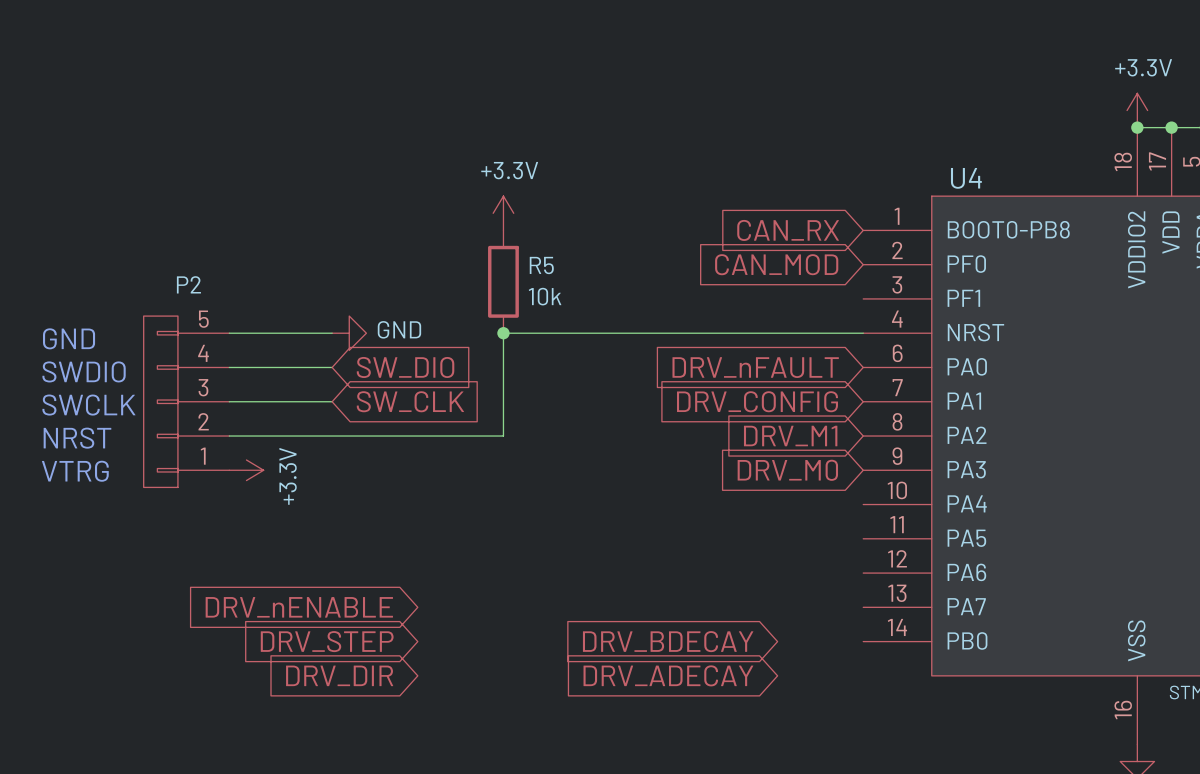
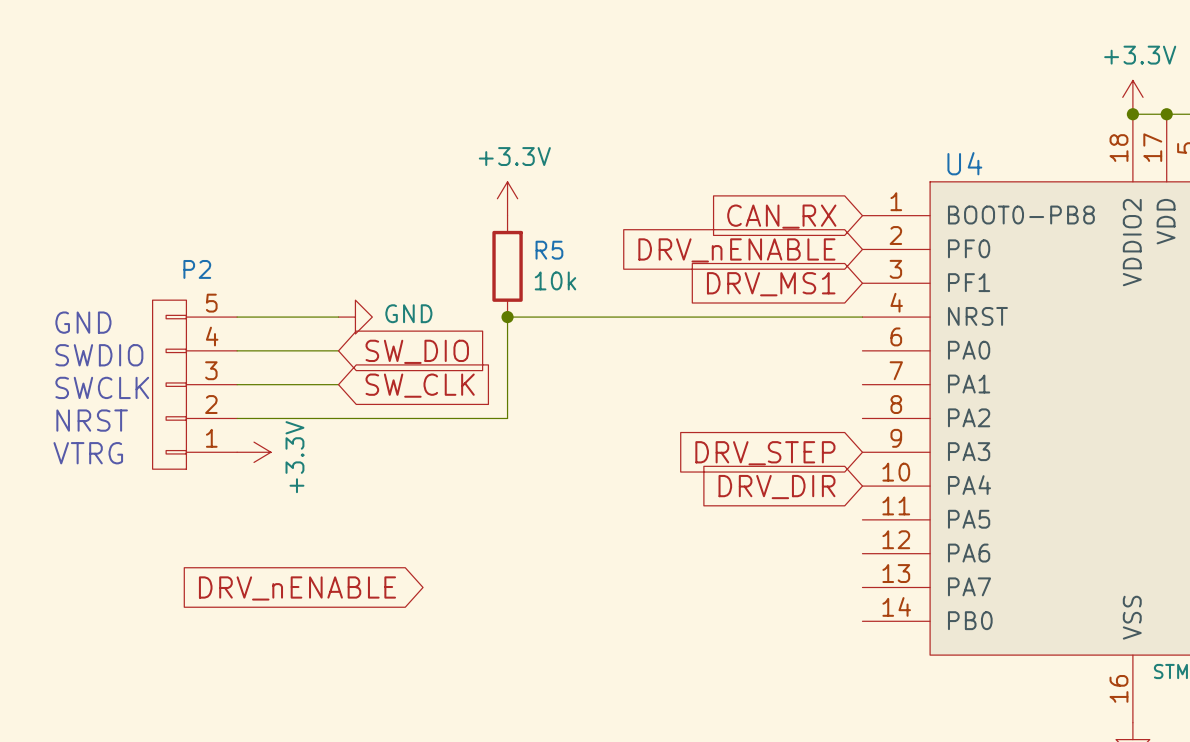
global label: CAN_MOD (776, 264) -> DRV_nENABLE (736, 250)
global label: none -> DRV_MS1 (771, 284)
global label: DRV_nFAULT (755, 367) -> none
global label: DRV_CONFIG (757, 401) -> none
global label: DRV_M1 (790, 436) -> none
global label: DRV_M0 (787, 470) -> DRV_STEP (765, 453)
global label: none -> DRV_DIR (777, 487)
global label: DRV_STEP (327, 641) -> none
global label: DRV_BDECAY (668, 641) -> none
global label: DRV_DIR (339, 675) -> none
global label: DRV_ADECAY (668, 675) -> none

